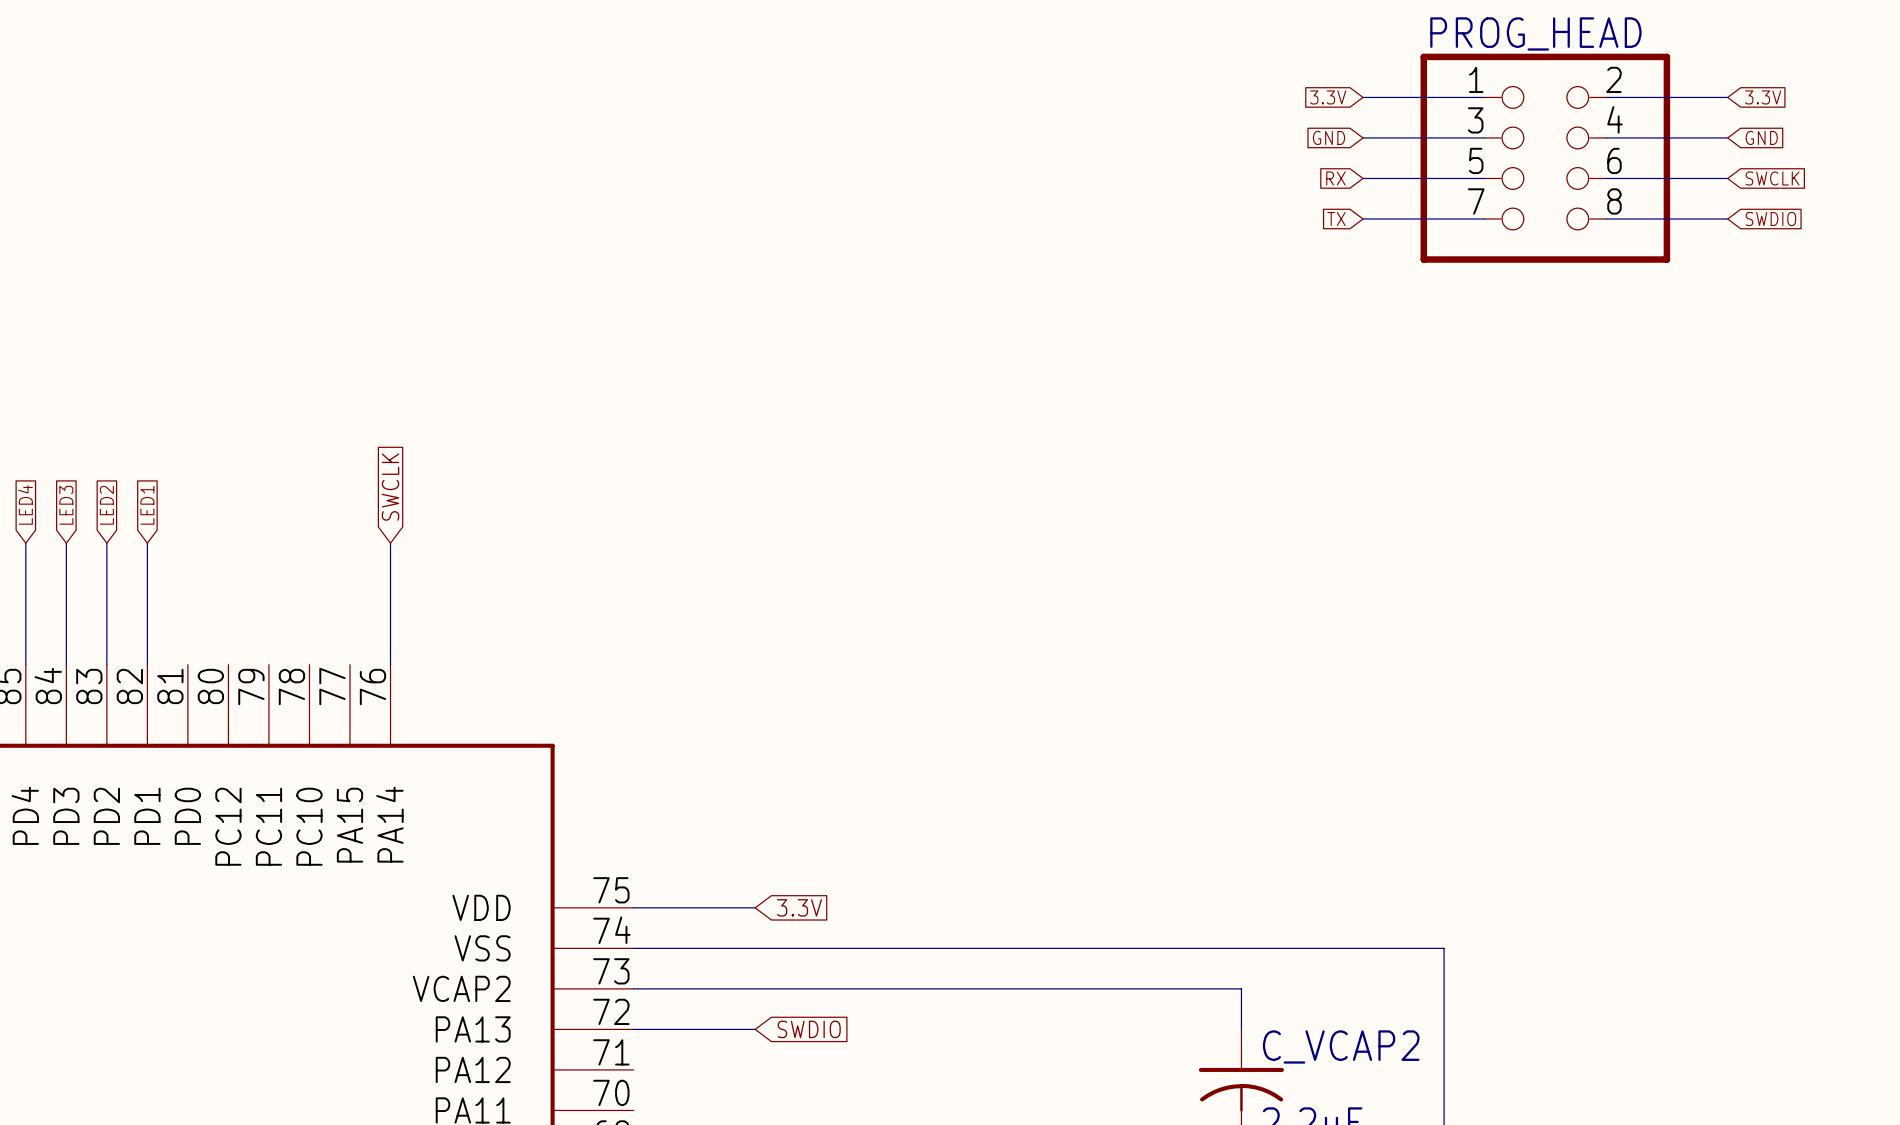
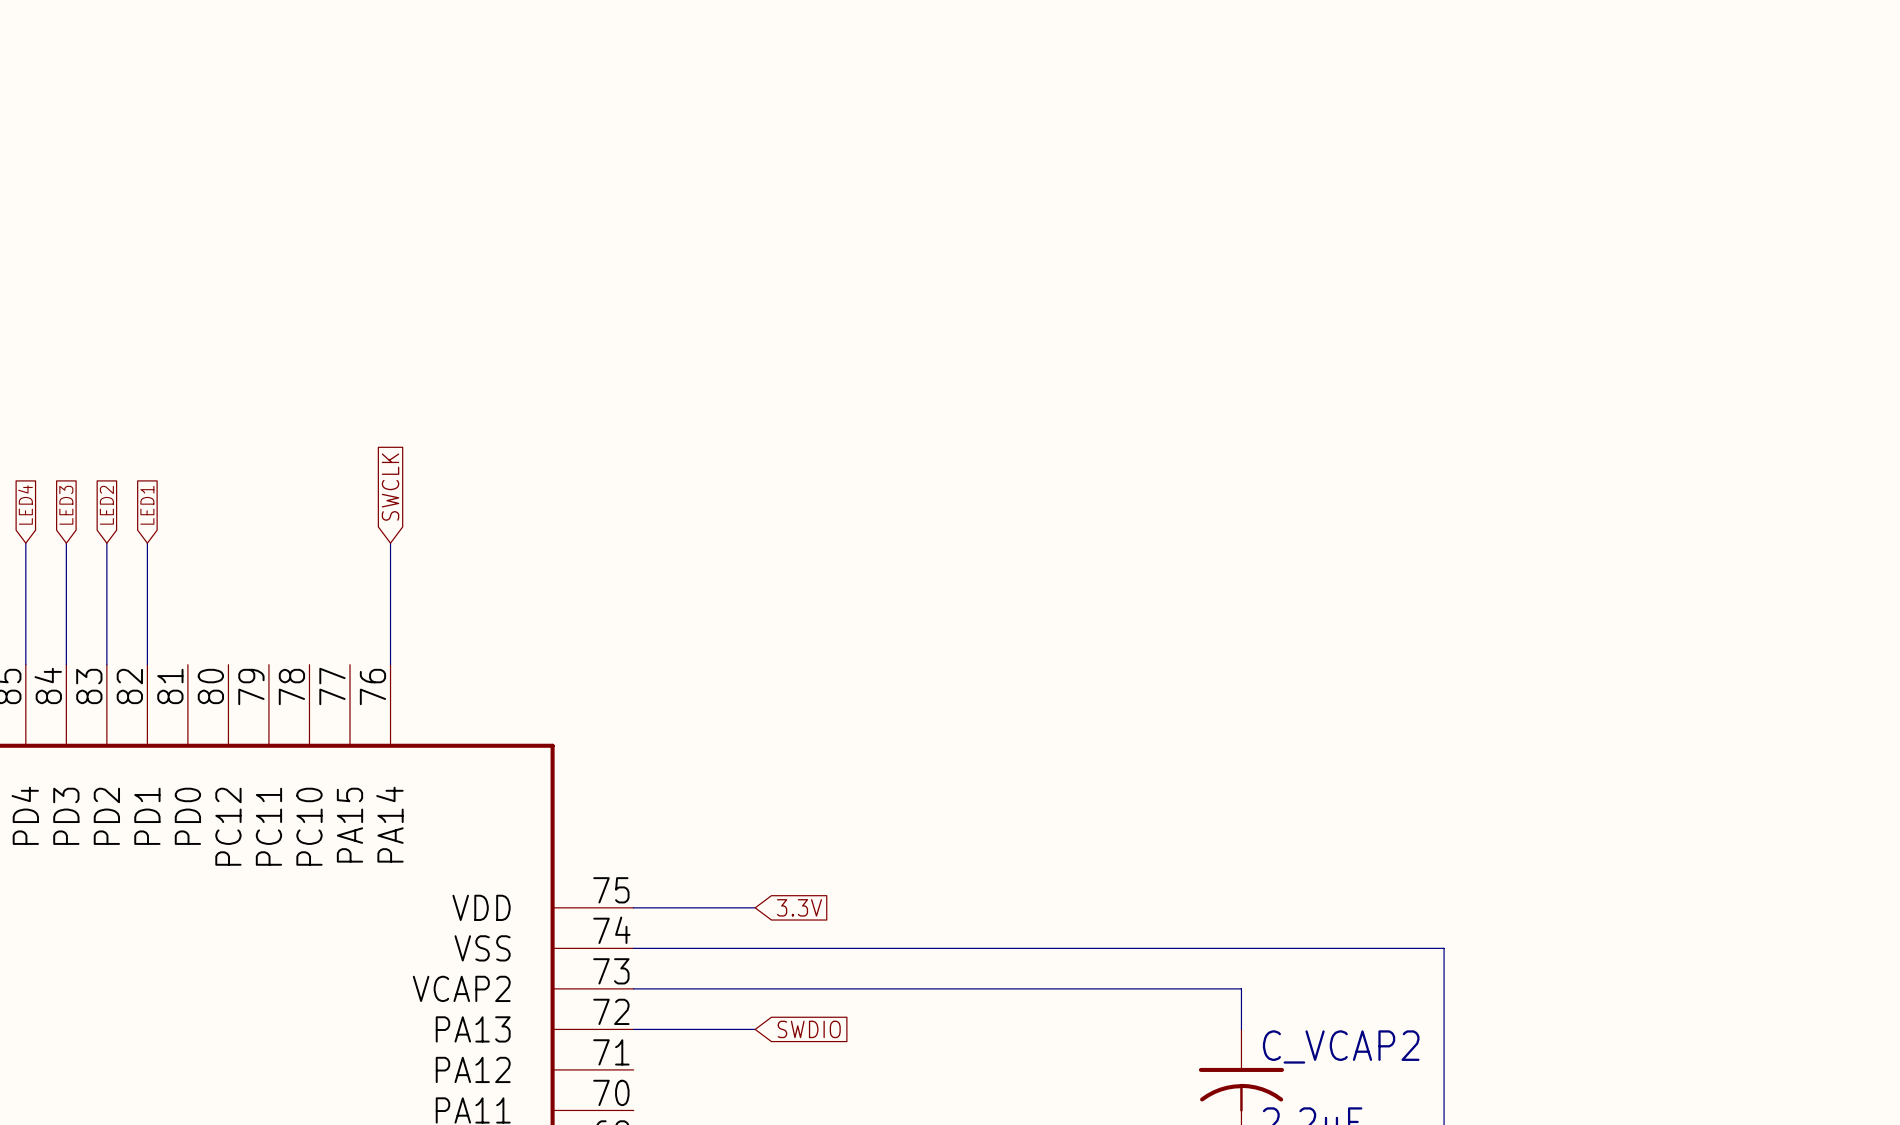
global label: 3.3V (1328, 97) -> none
wire: (1363, 97) (1484, 97) -> none
wire: (1606, 97) (1727, 97) -> none
global label: 3.3V (1763, 97) -> none
global label: GND (1328, 137) -> none
wire: (1363, 137) (1484, 137) -> none
wire: (1606, 137) (1727, 137) -> none
global label: GND (1761, 137) -> none
PROG_HEAD: (1545, 158) -> none
global label: RX (1335, 178) -> none
wire: (1363, 178) (1484, 178) -> none
wire: (1606, 178) (1727, 178) -> none
global label: SWCLK (1772, 178) -> none
global label: TX (1336, 219) -> none
wire: (1363, 219) (1484, 219) -> none
wire: (1606, 219) (1727, 219) -> none
global label: SWDIO (1770, 219) -> none

